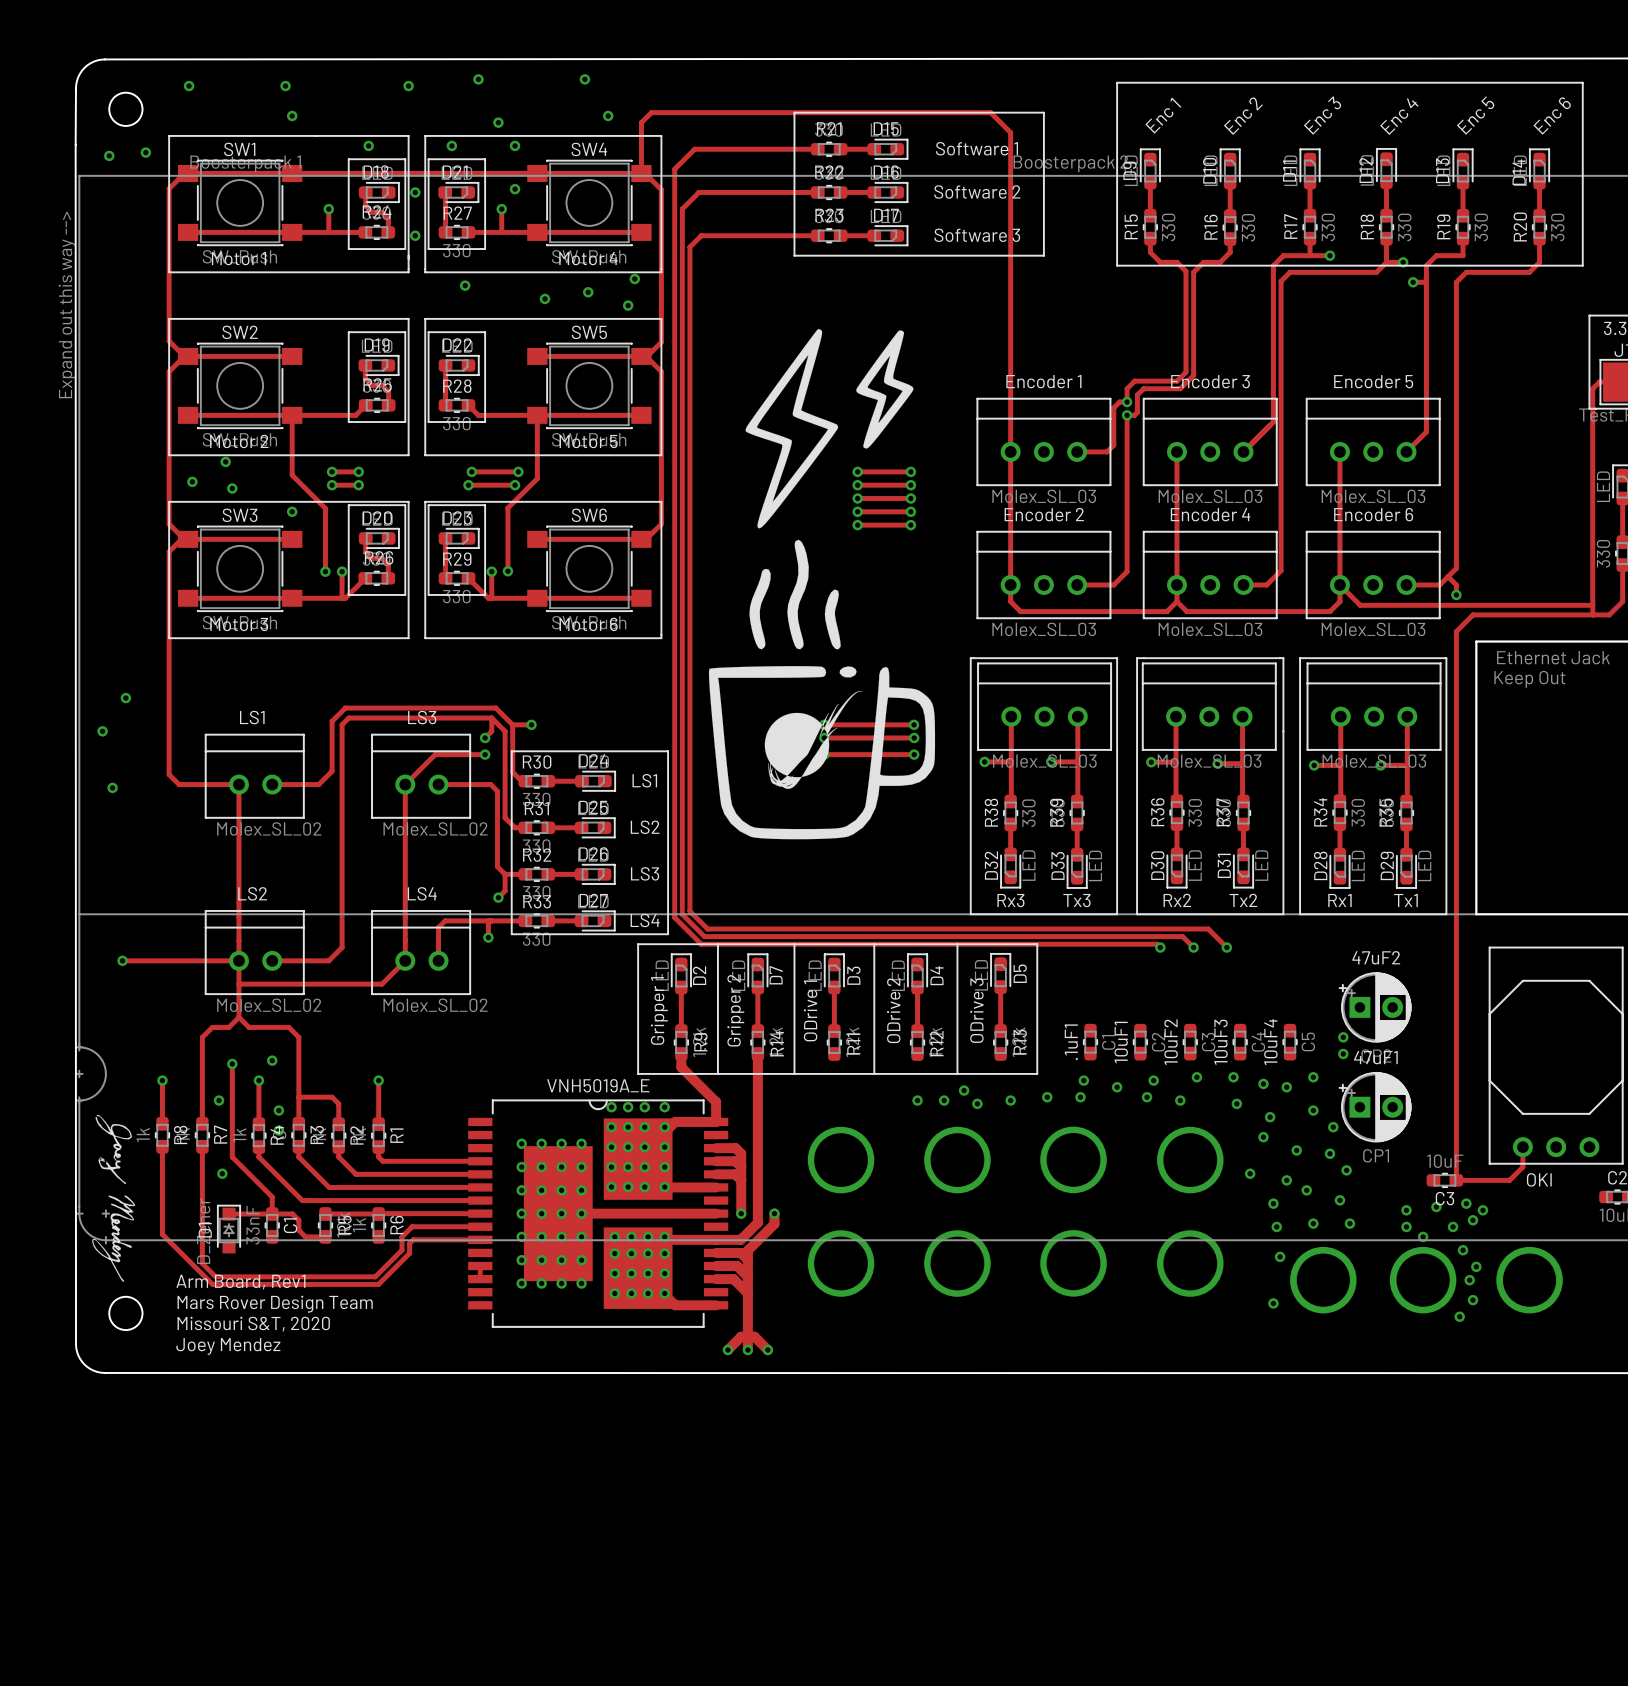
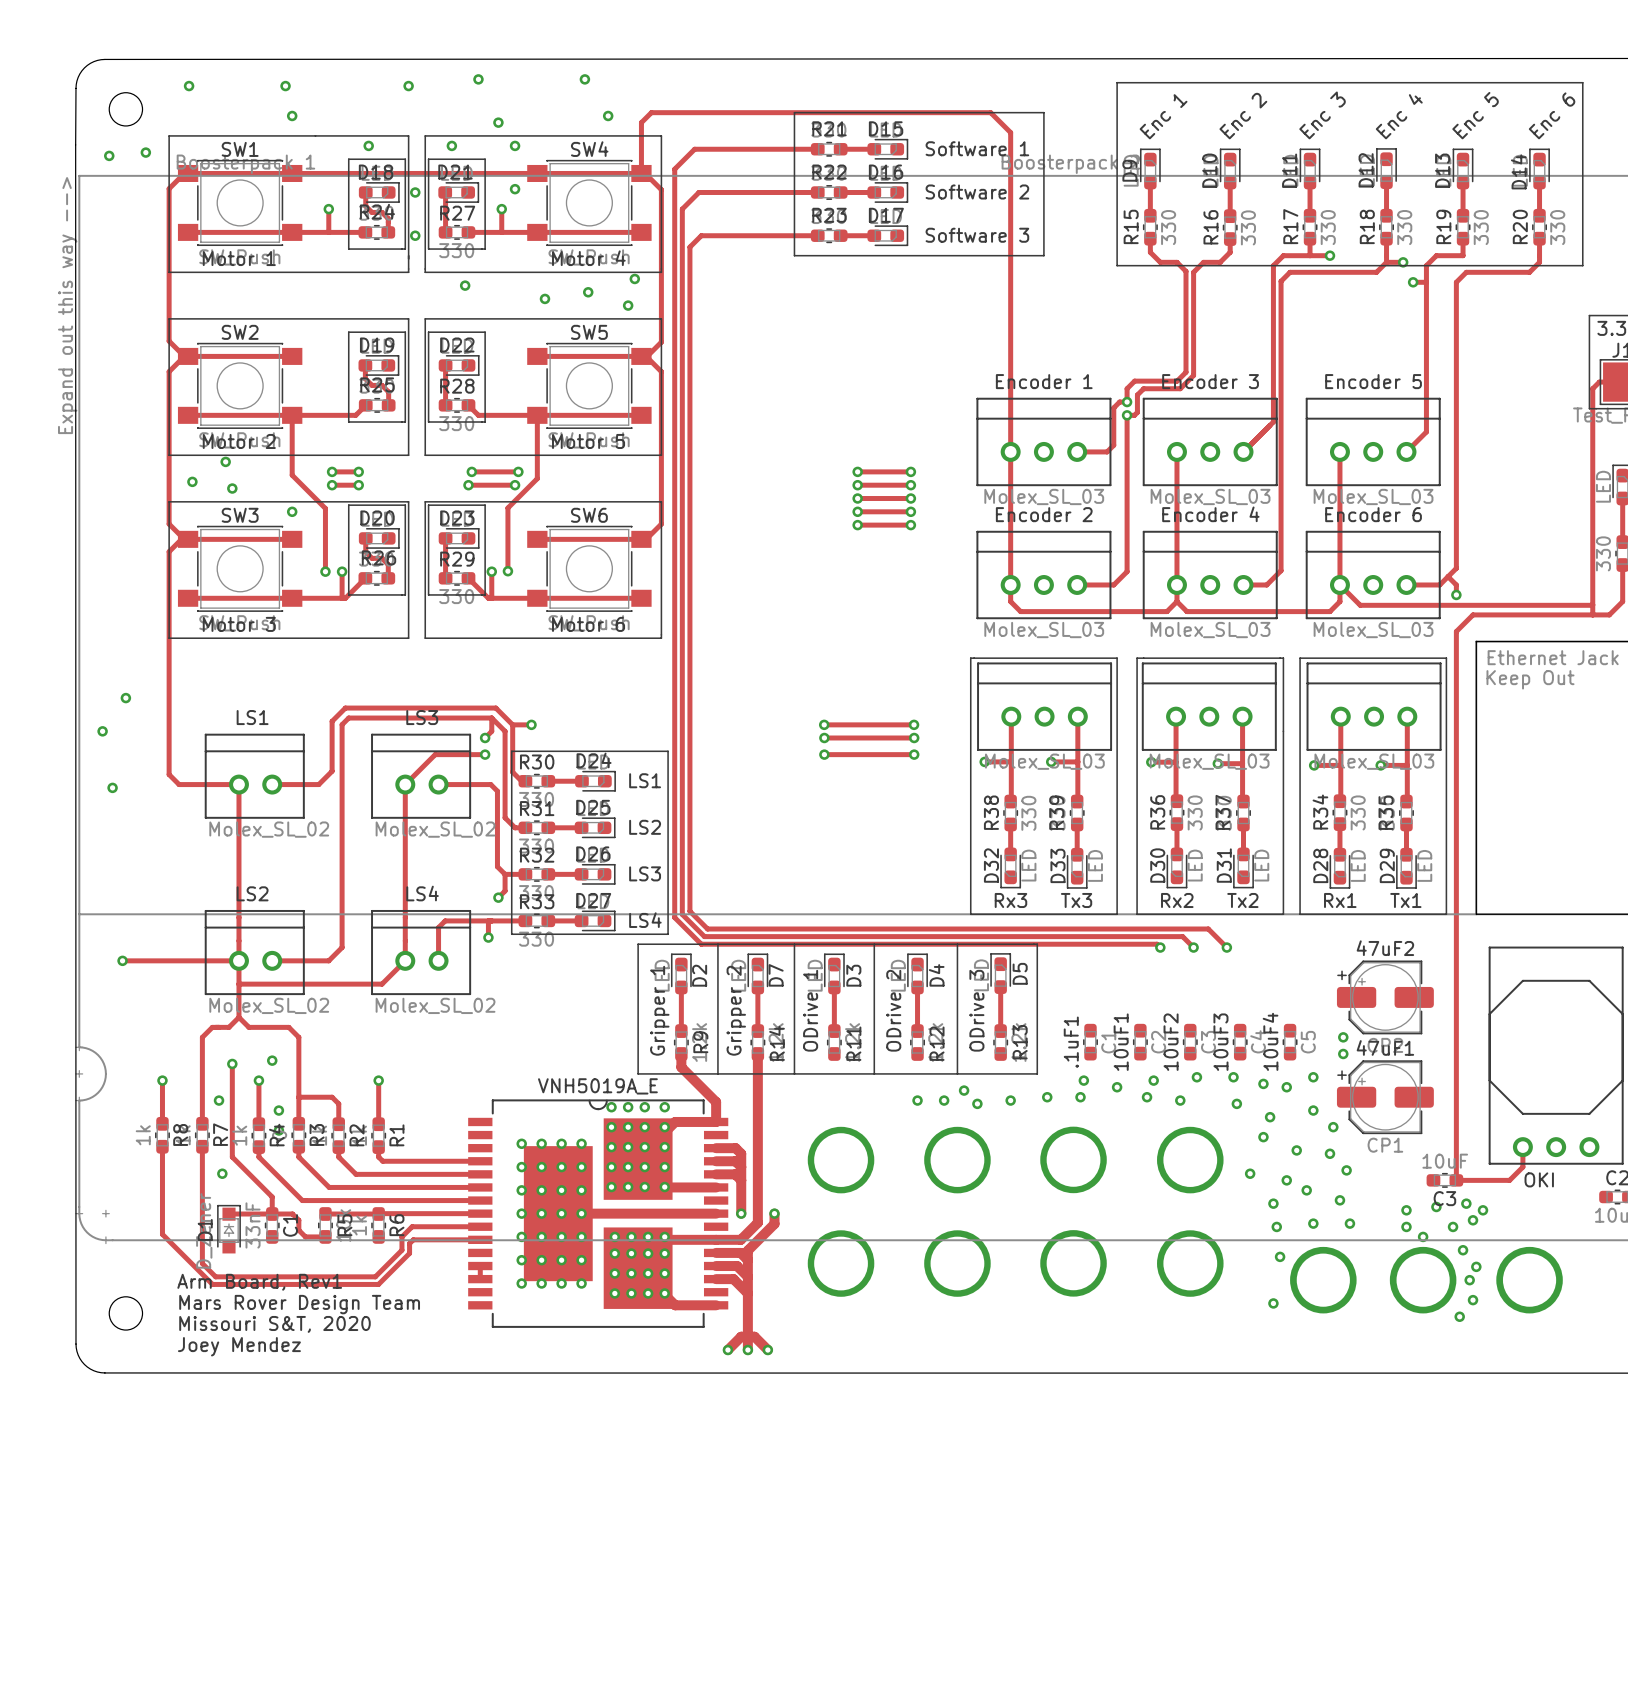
drawing: [708, 329, 936, 840] -> none
47uF2 footprint: [1338, 972, 1412, 1043] -> [1336, 960, 1434, 1035]
47uF1 footprint: [1338, 1072, 1412, 1143] -> [1336, 1060, 1434, 1135]
drawing: [92, 1114, 136, 1282] -> none

